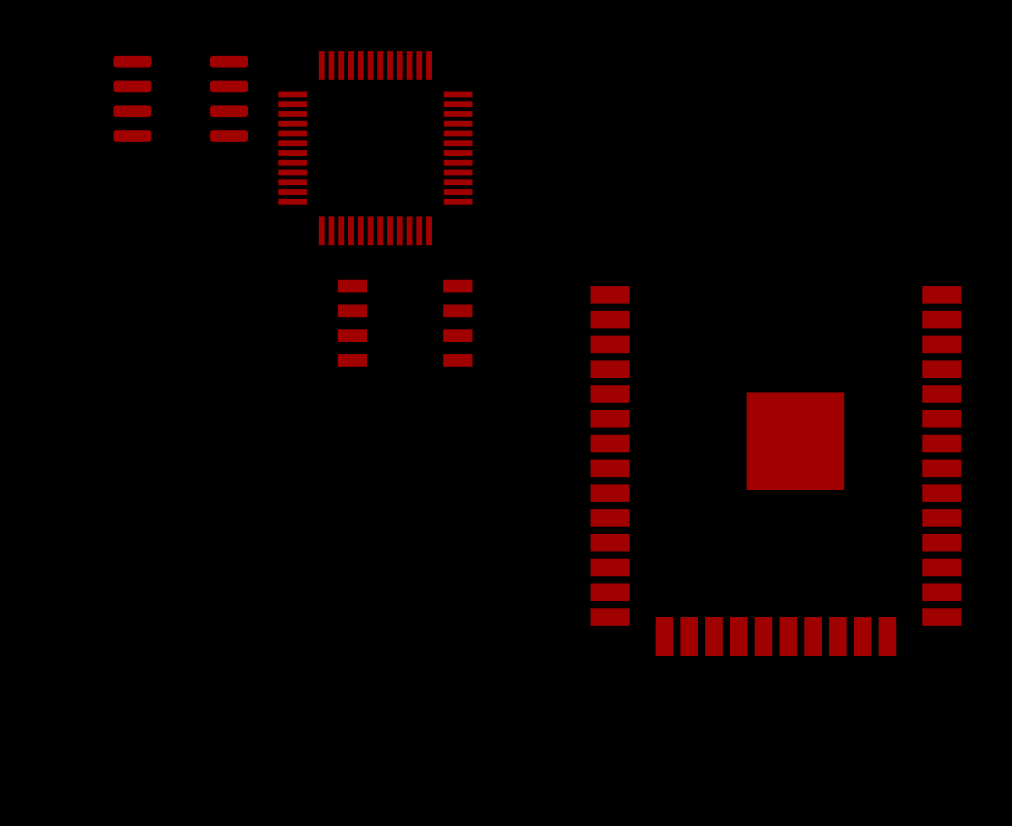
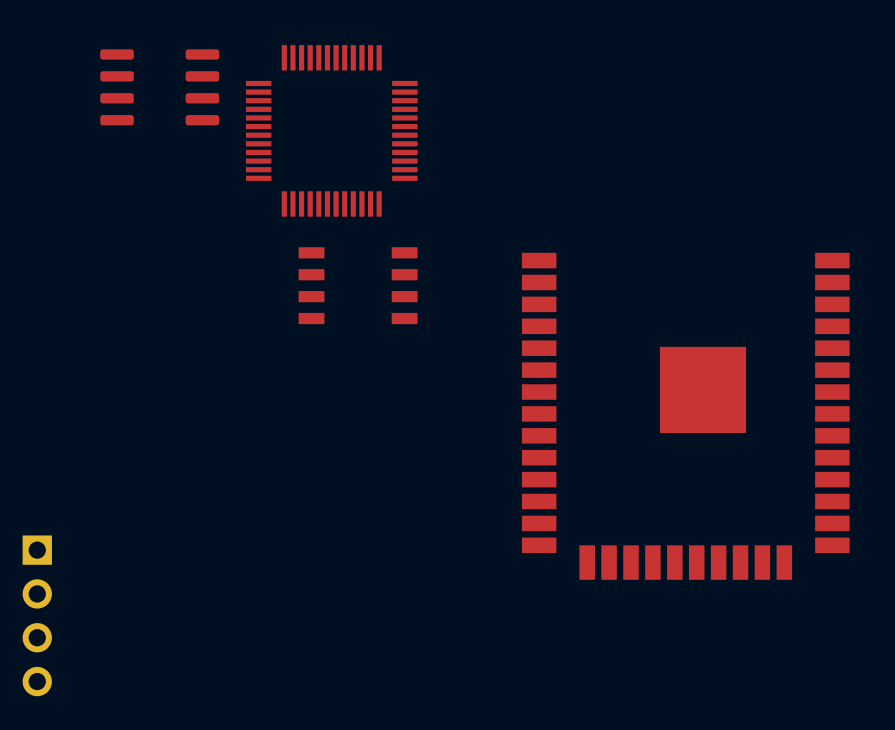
part: none -> (37, 615)

